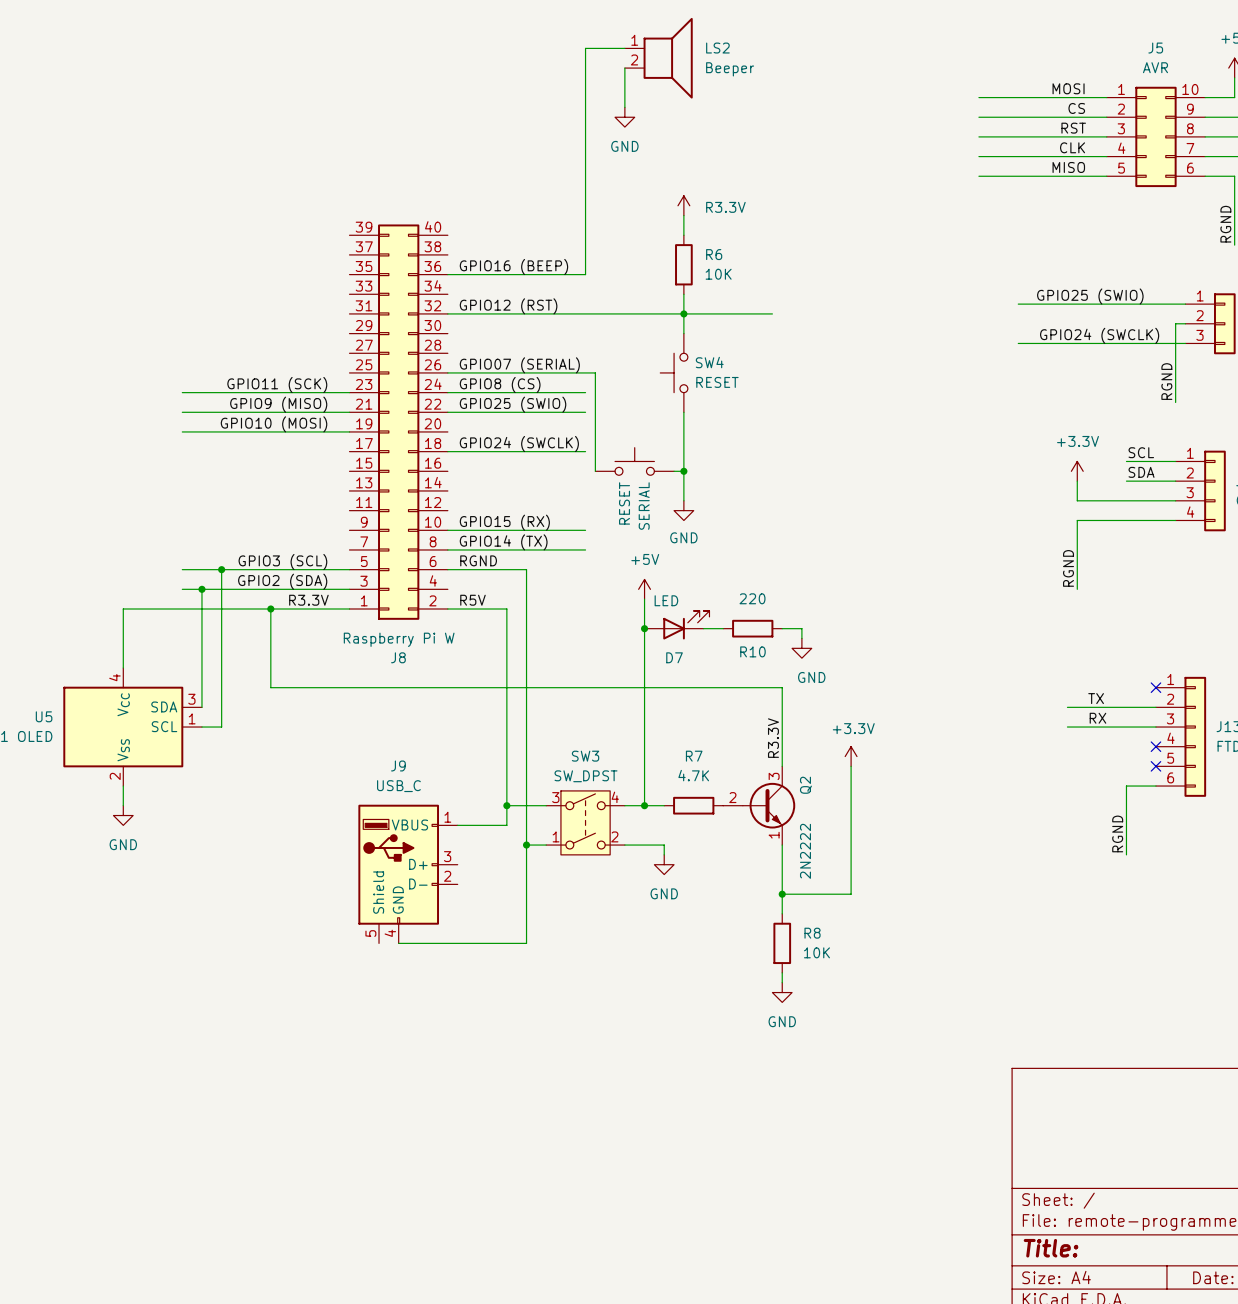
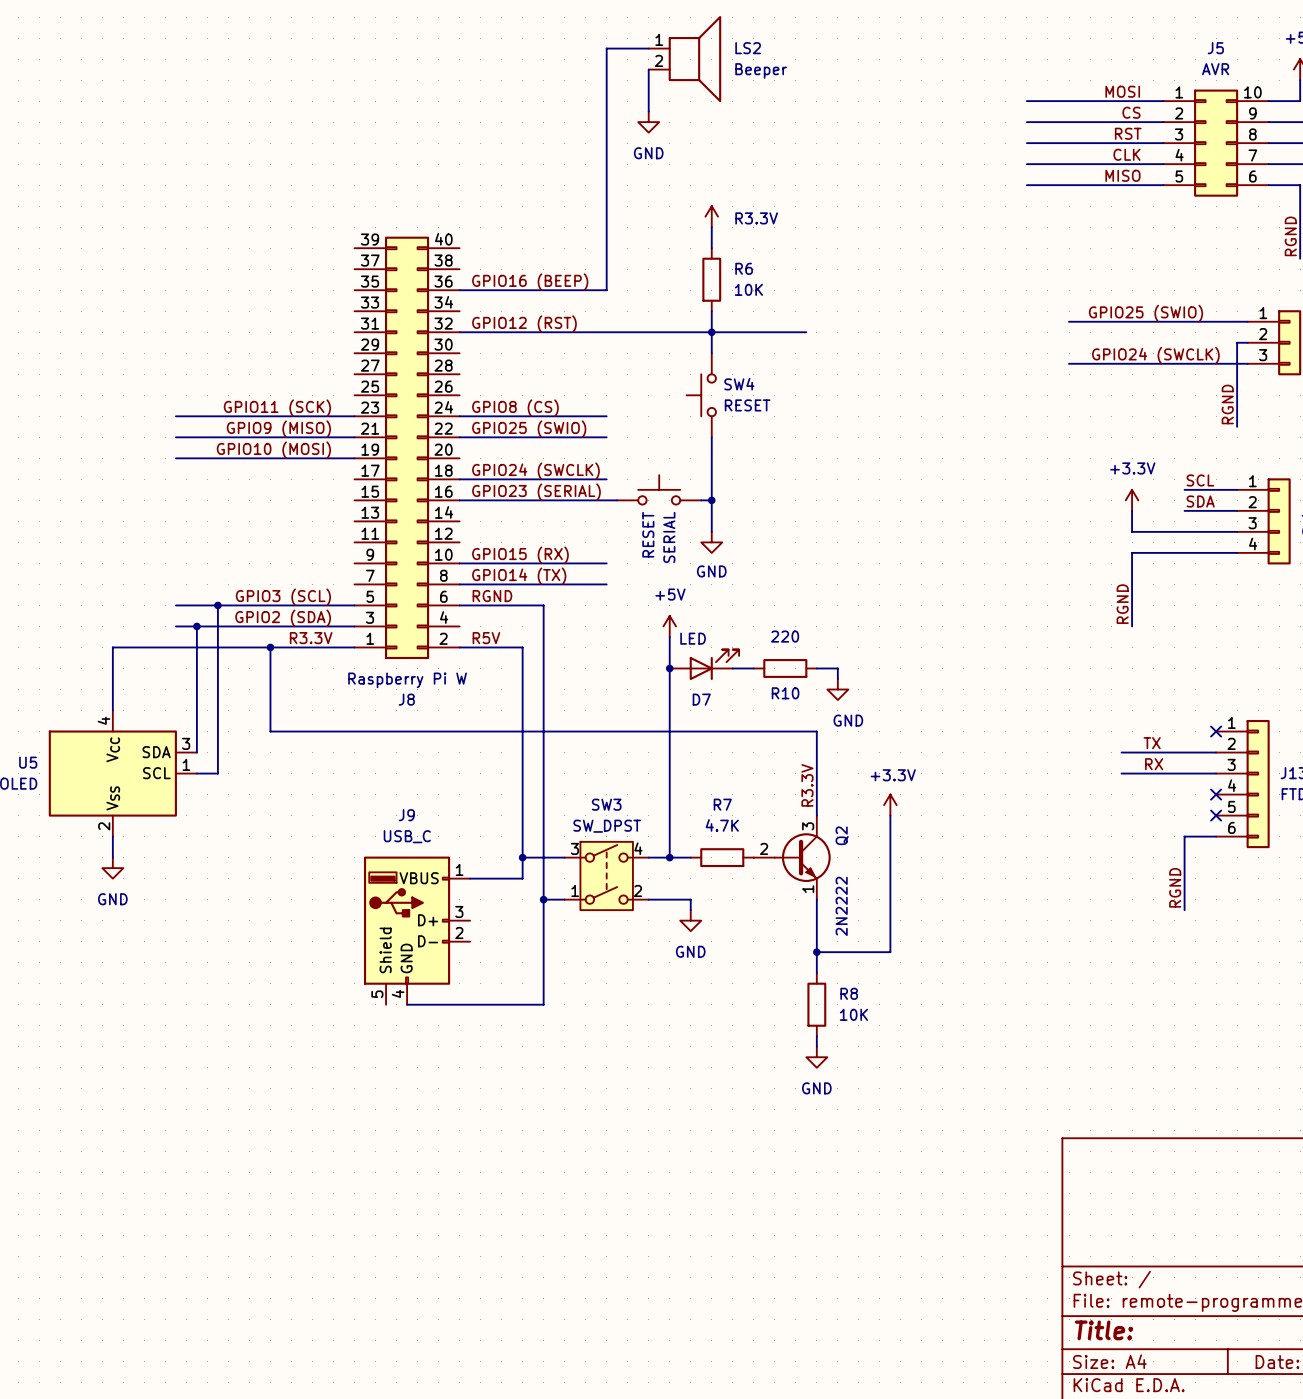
label: GPIO07 (SERIAL) (519, 365) -> none
wire: (447, 372) (595, 372) (595, 471) -> (459, 500) (617, 500)
label: none -> GPIO23 (SERIAL) (536, 492)

